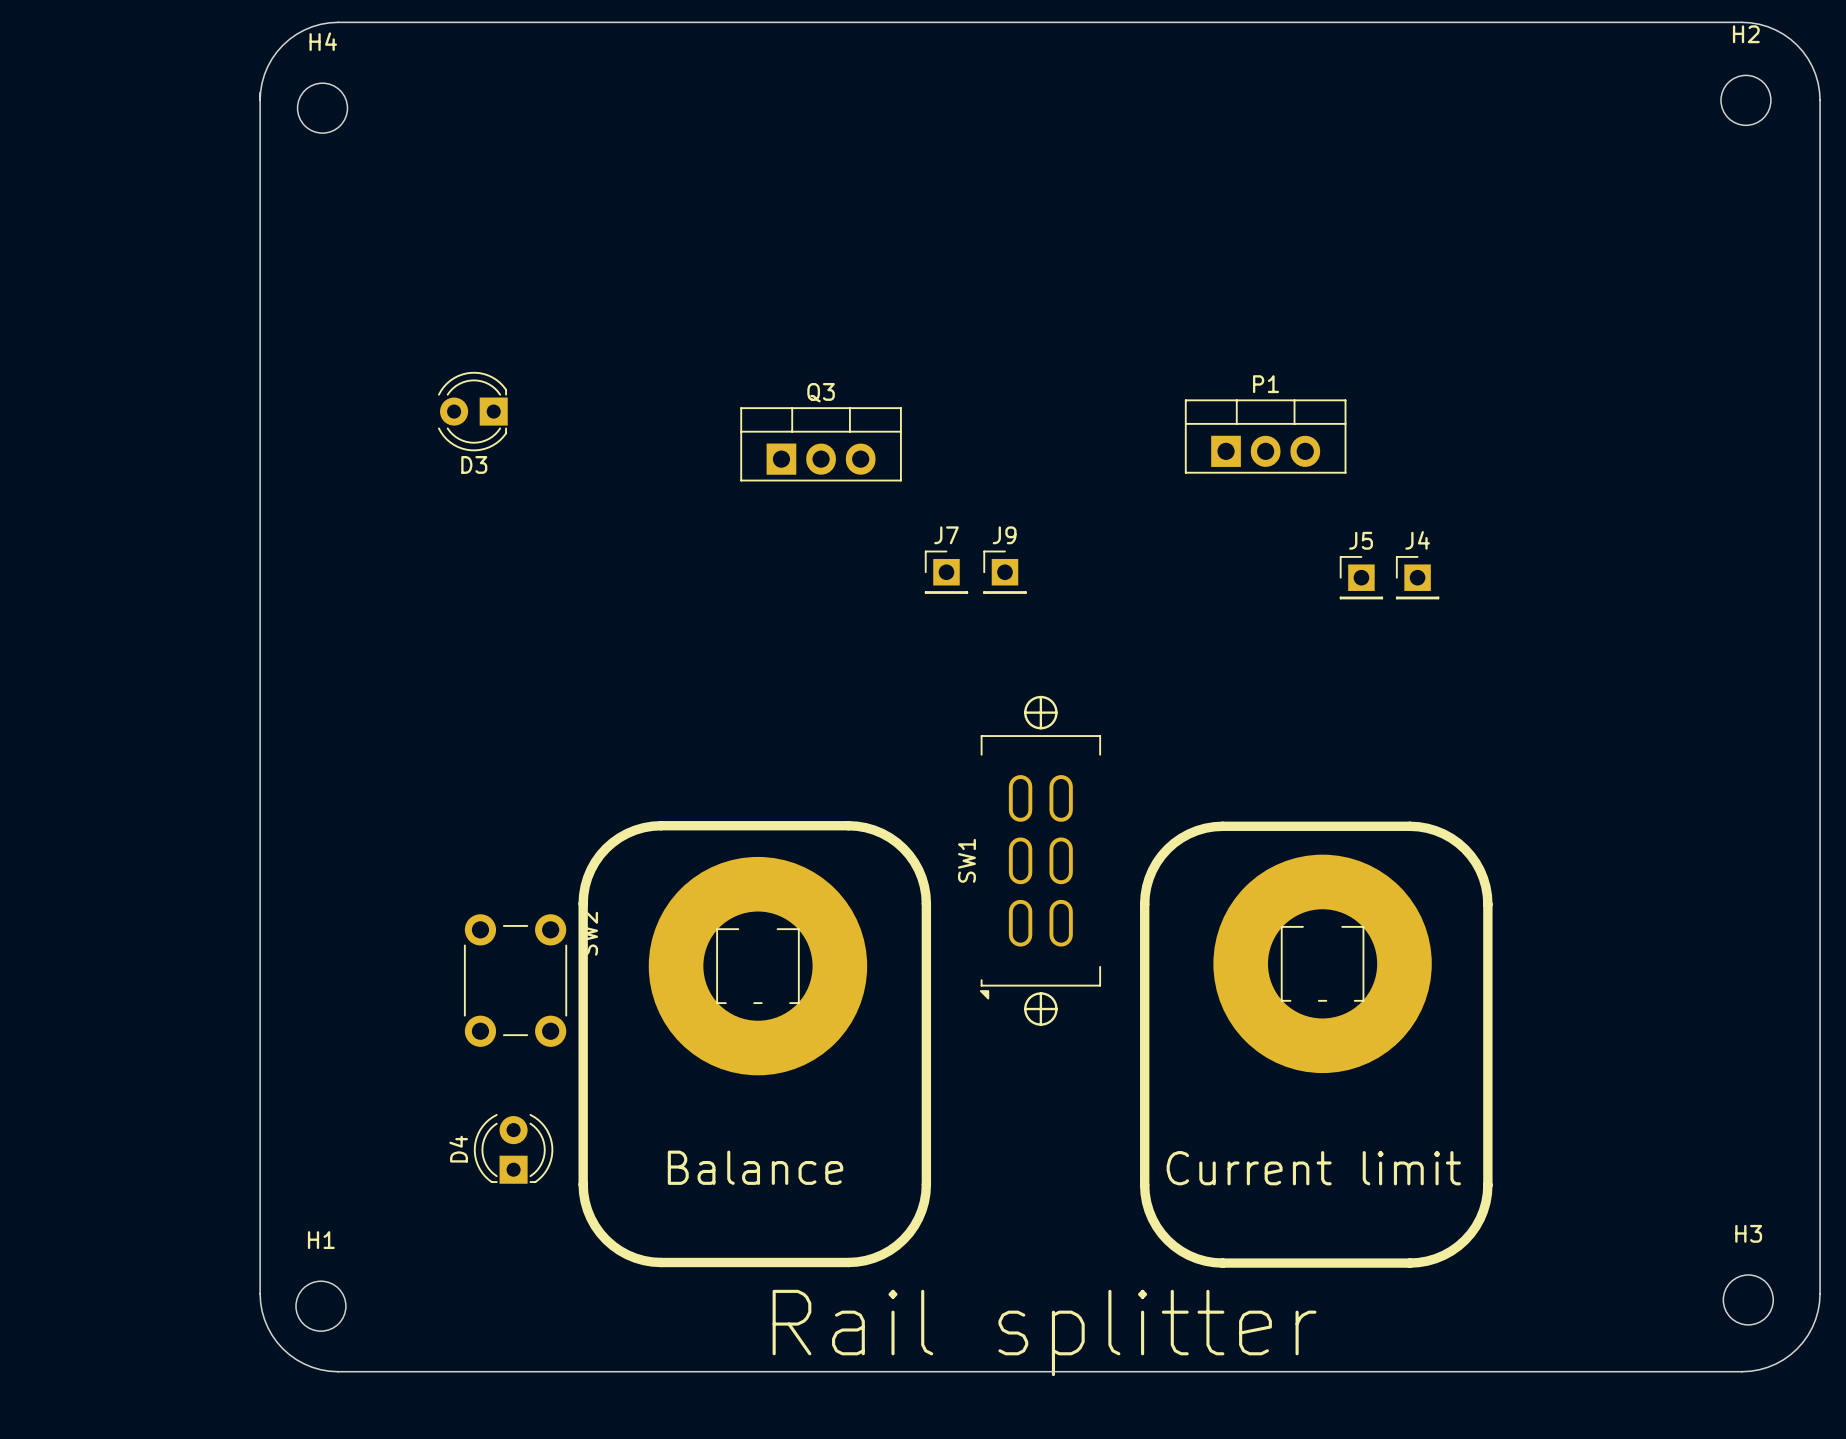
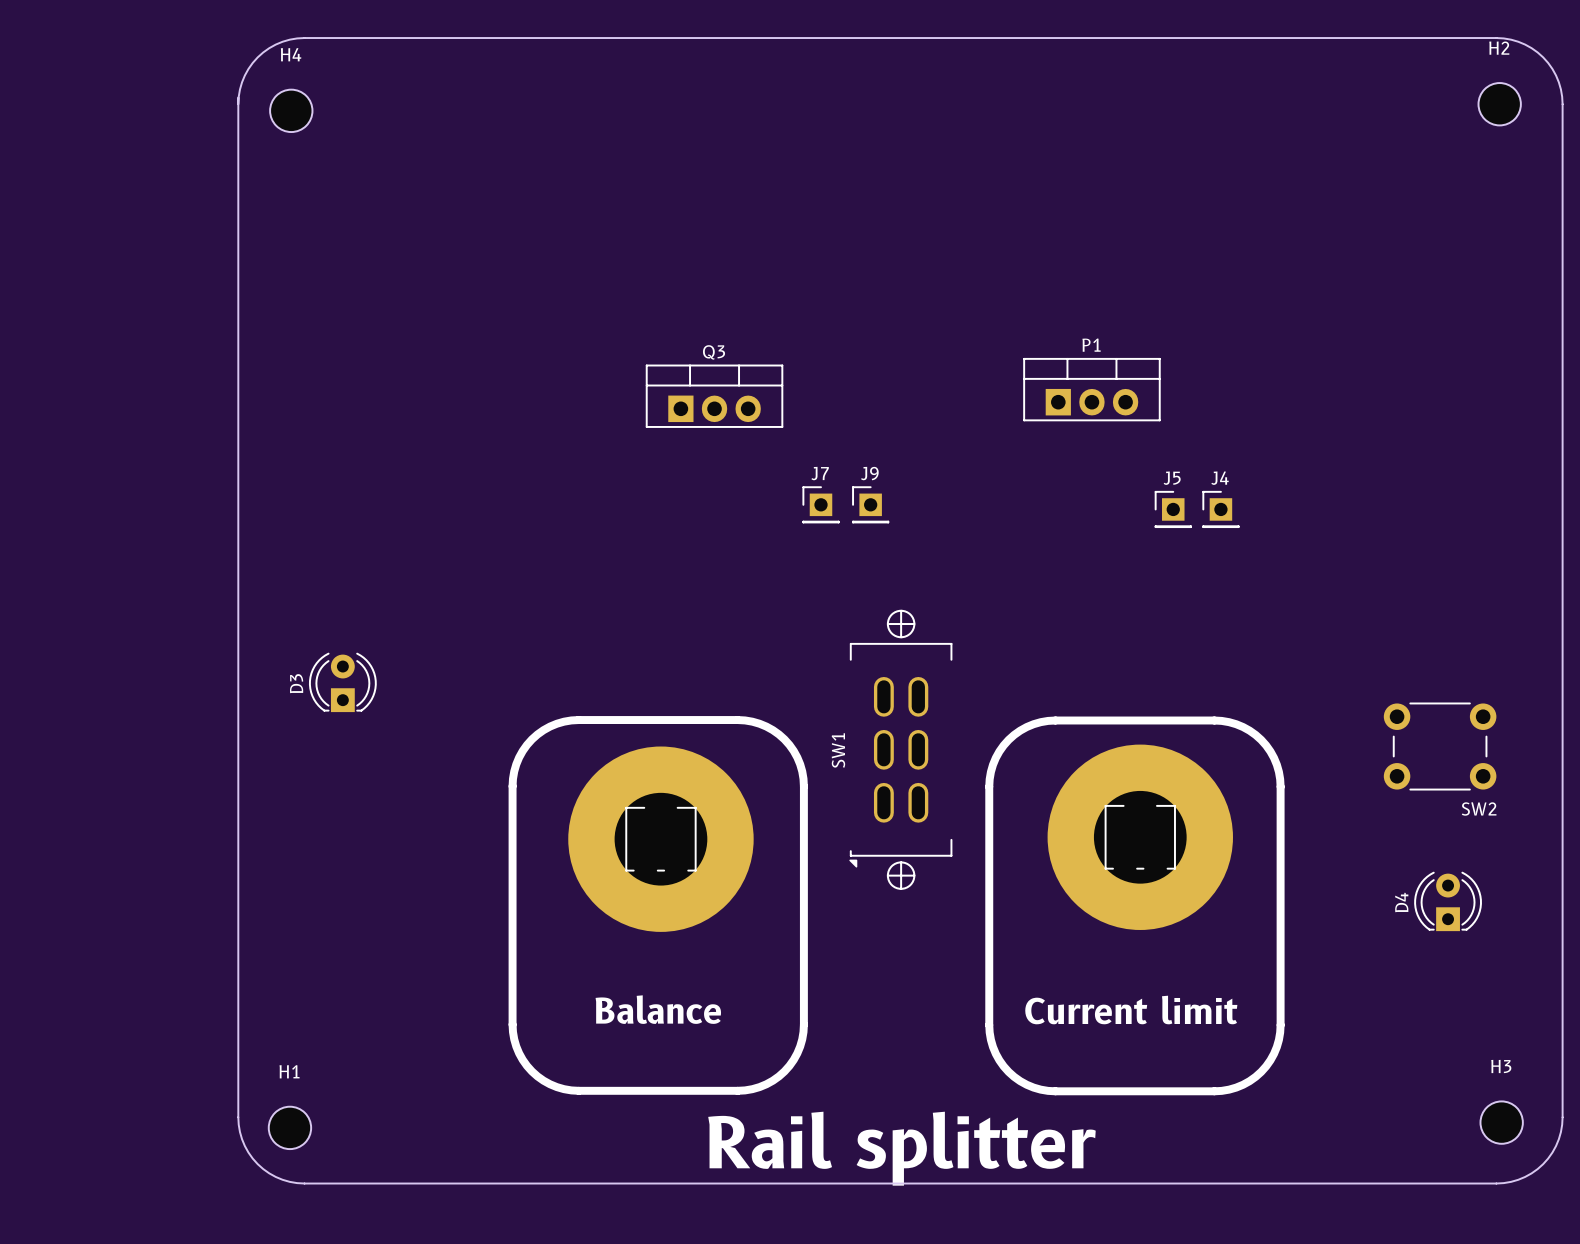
D3 rotation: 0° (472, 411) -> 90° clockwise (342, 682)
D3 position: (472, 411) -> (342, 682)
SW2 rotation: 0° (515, 980) -> 90° clockwise (1440, 746)
SW2 position: (515, 980) -> (1440, 746)
D4 position: (513, 1148) -> (1448, 901)

